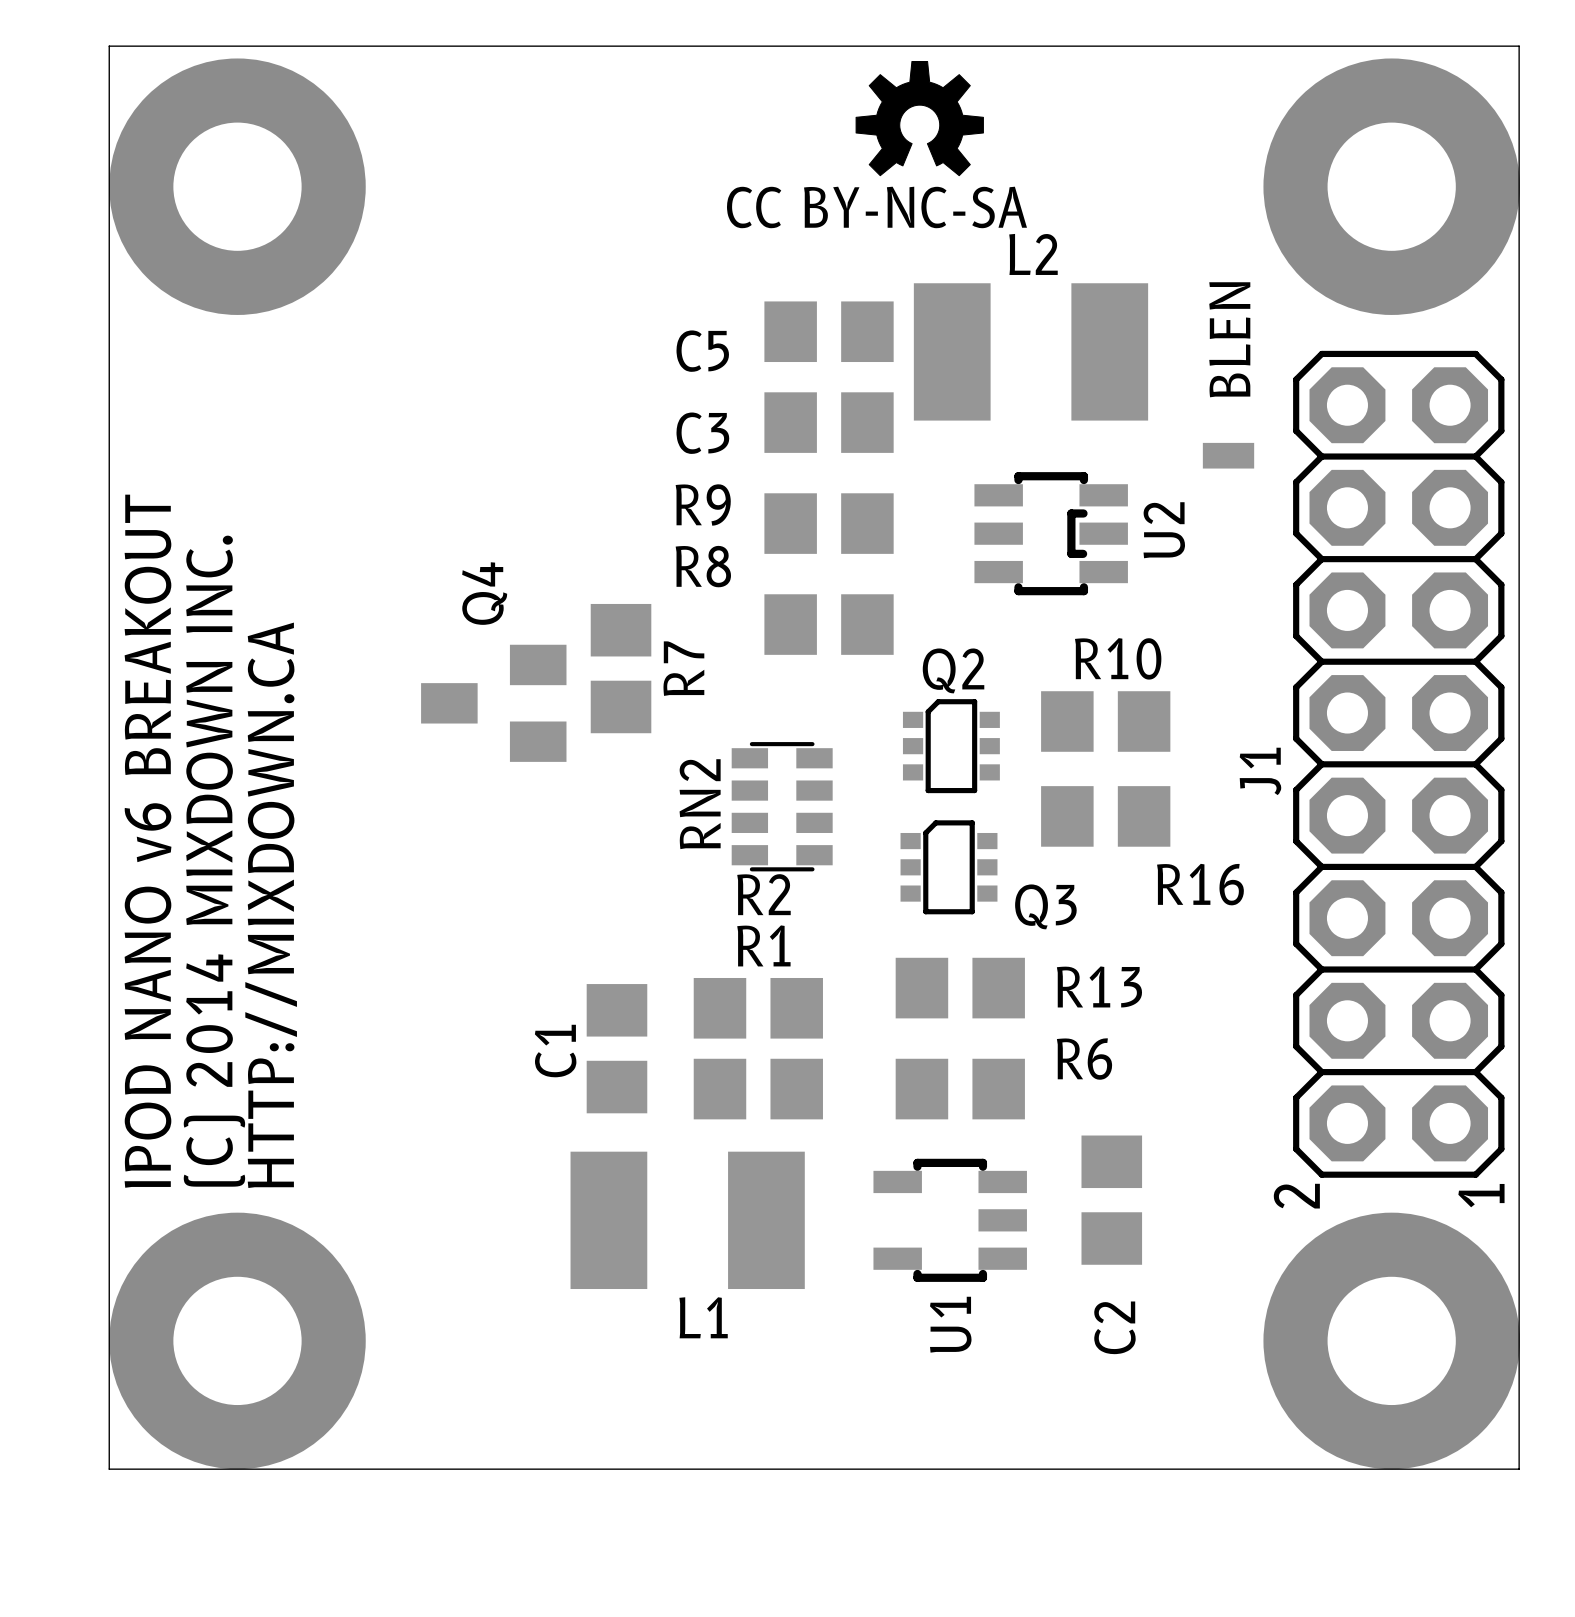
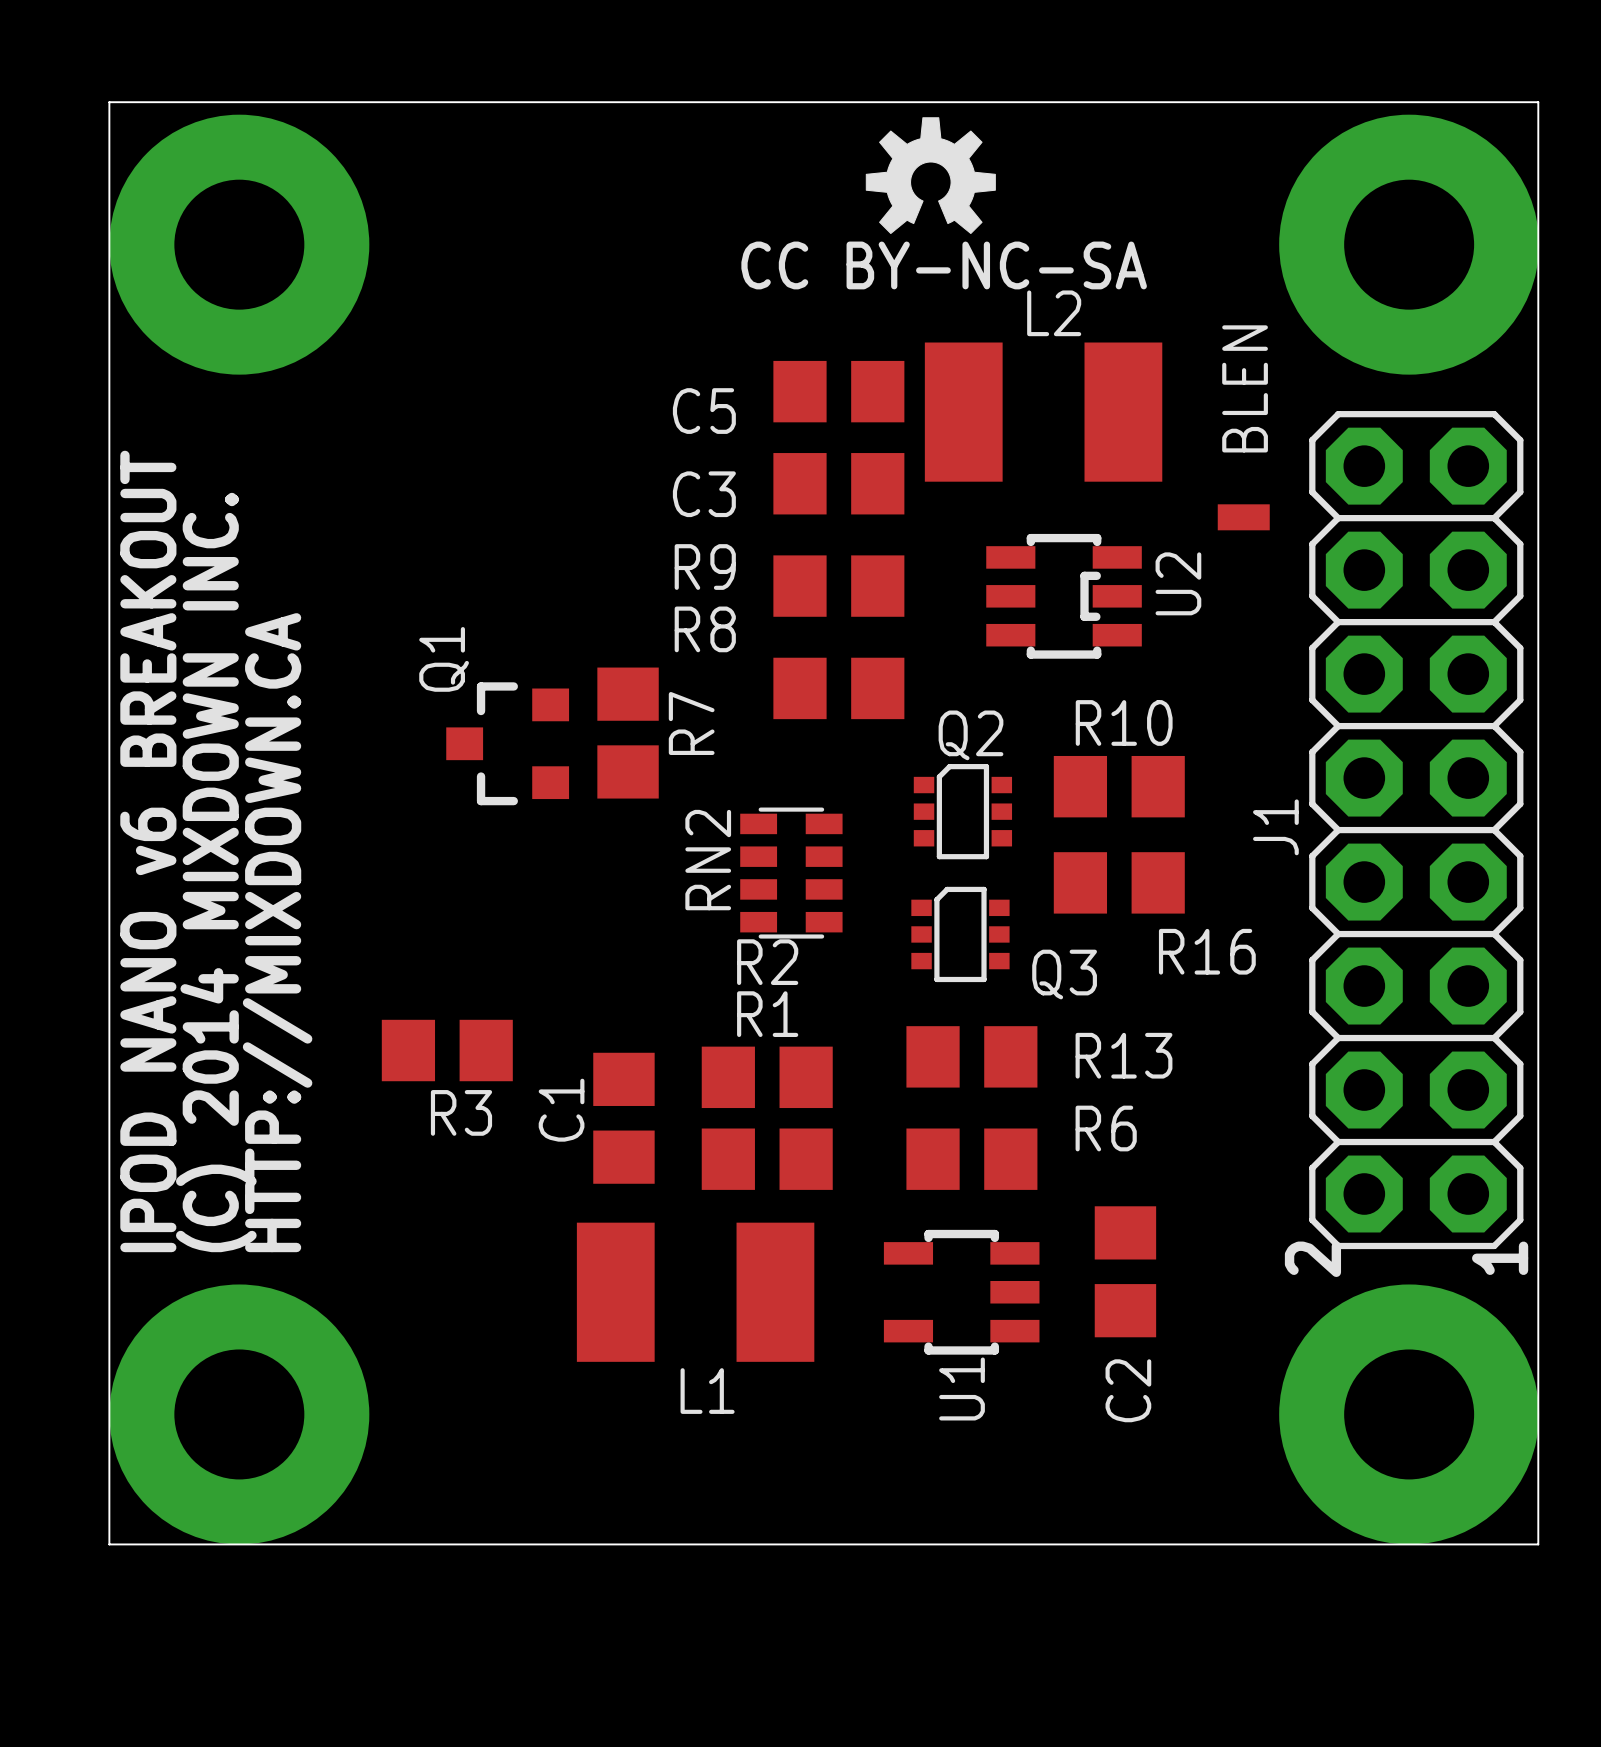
Q1: none -> (507, 743)
Q4: (493, 703) -> none
R3: none -> (447, 1050)

